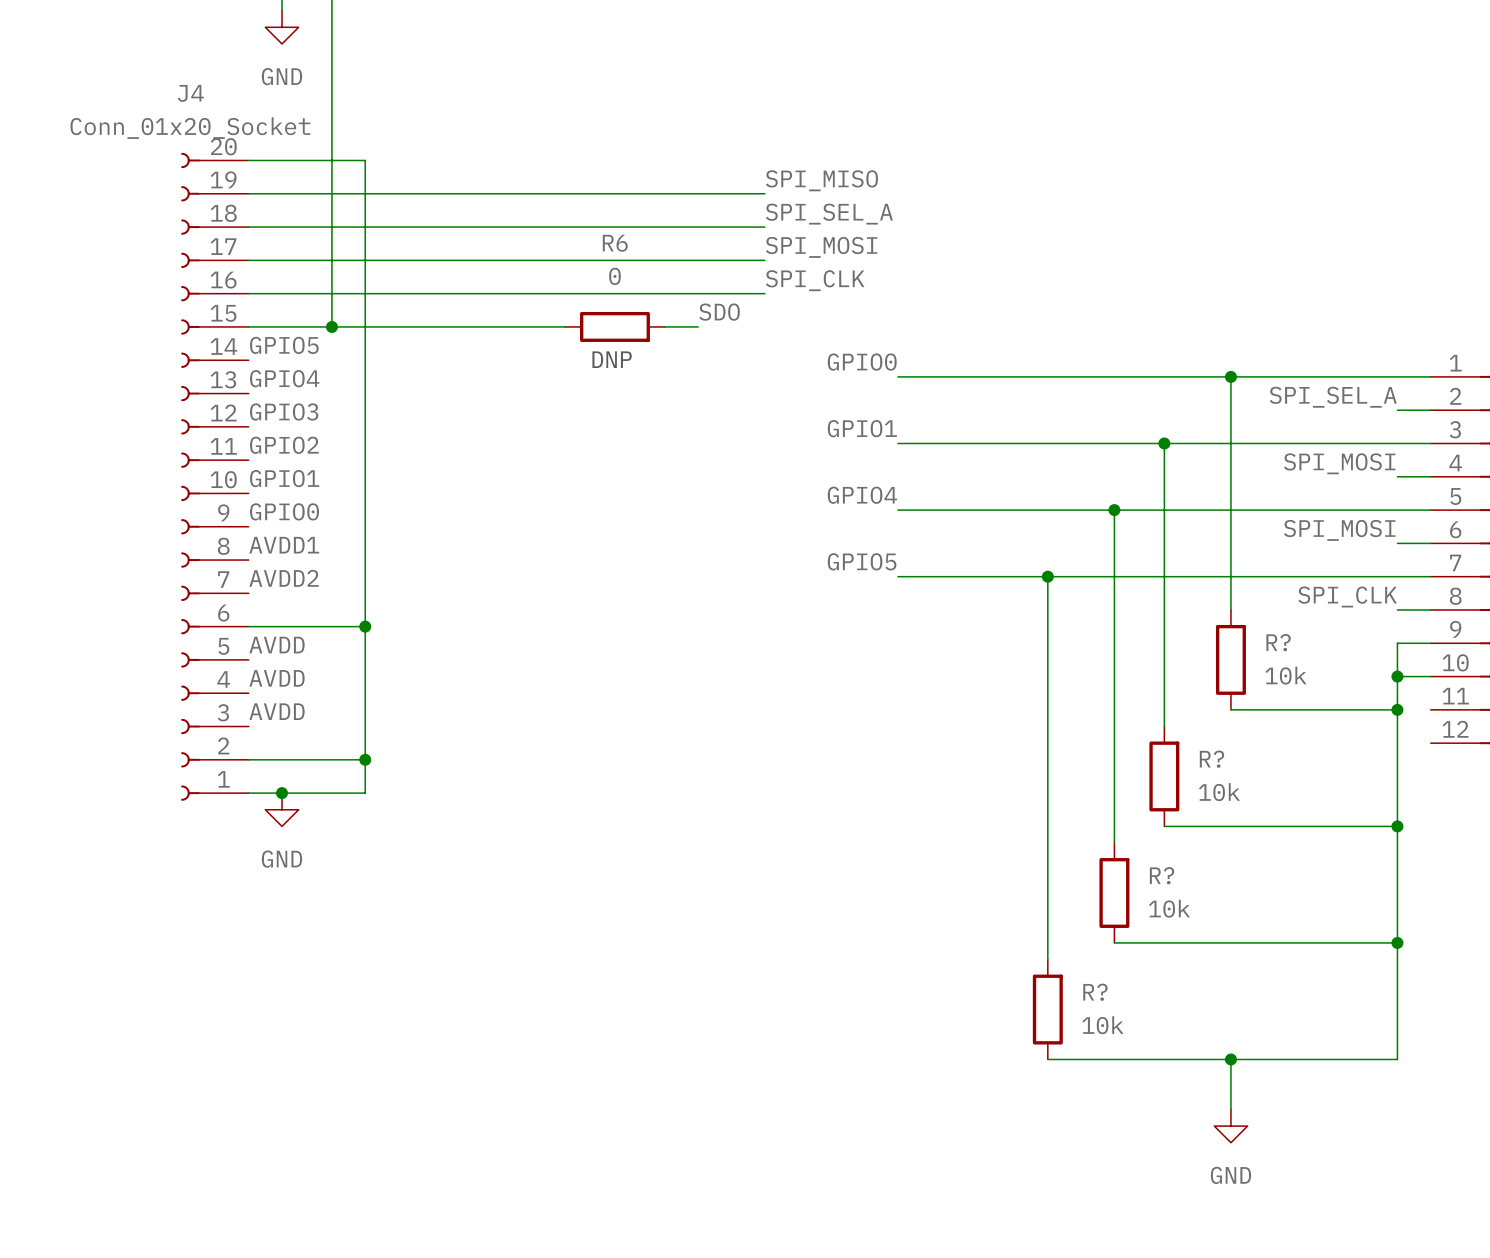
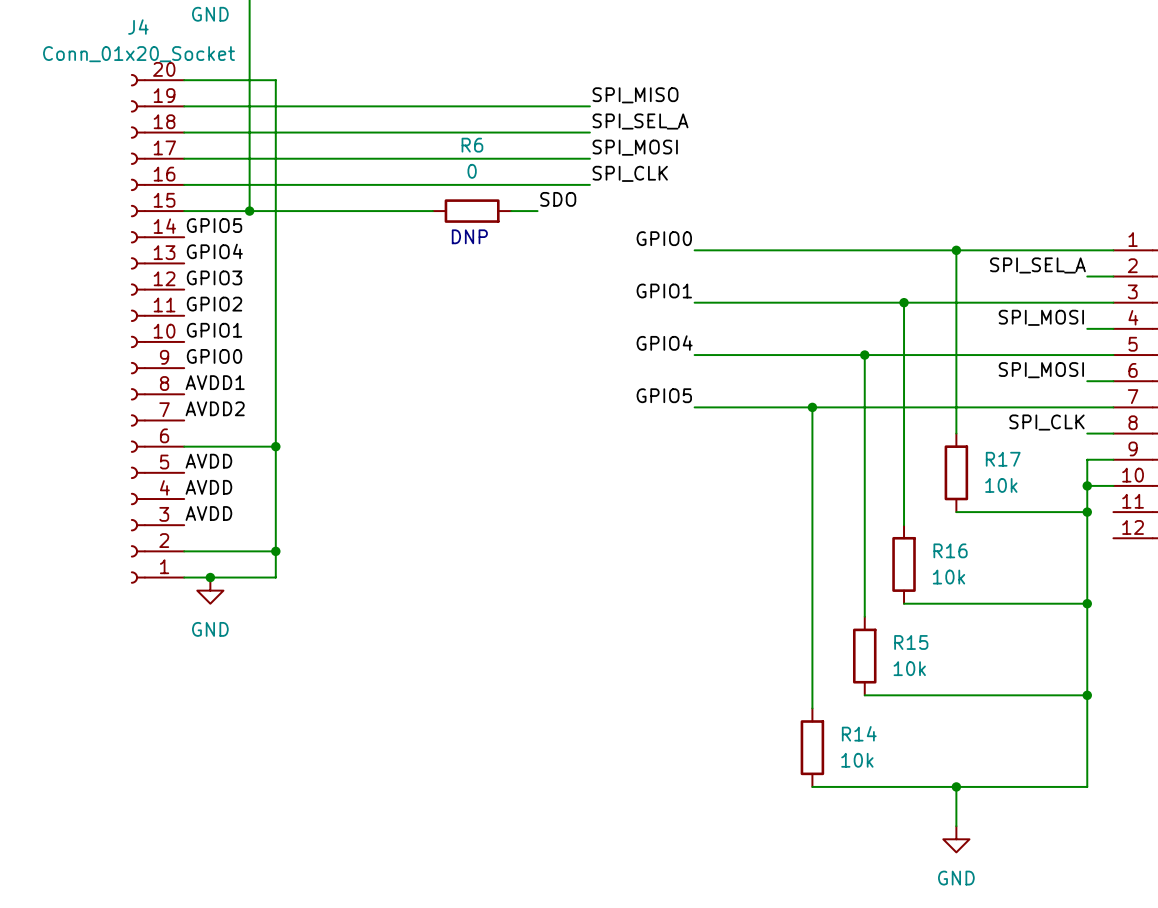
R? name: R? (1278, 642) -> R17 (1003, 459)
R? name: R? (1211, 759) -> R16 (950, 550)
R? name: R? (1162, 875) -> R15 (911, 642)
R? name: R? (1095, 992) -> R14 (859, 733)

